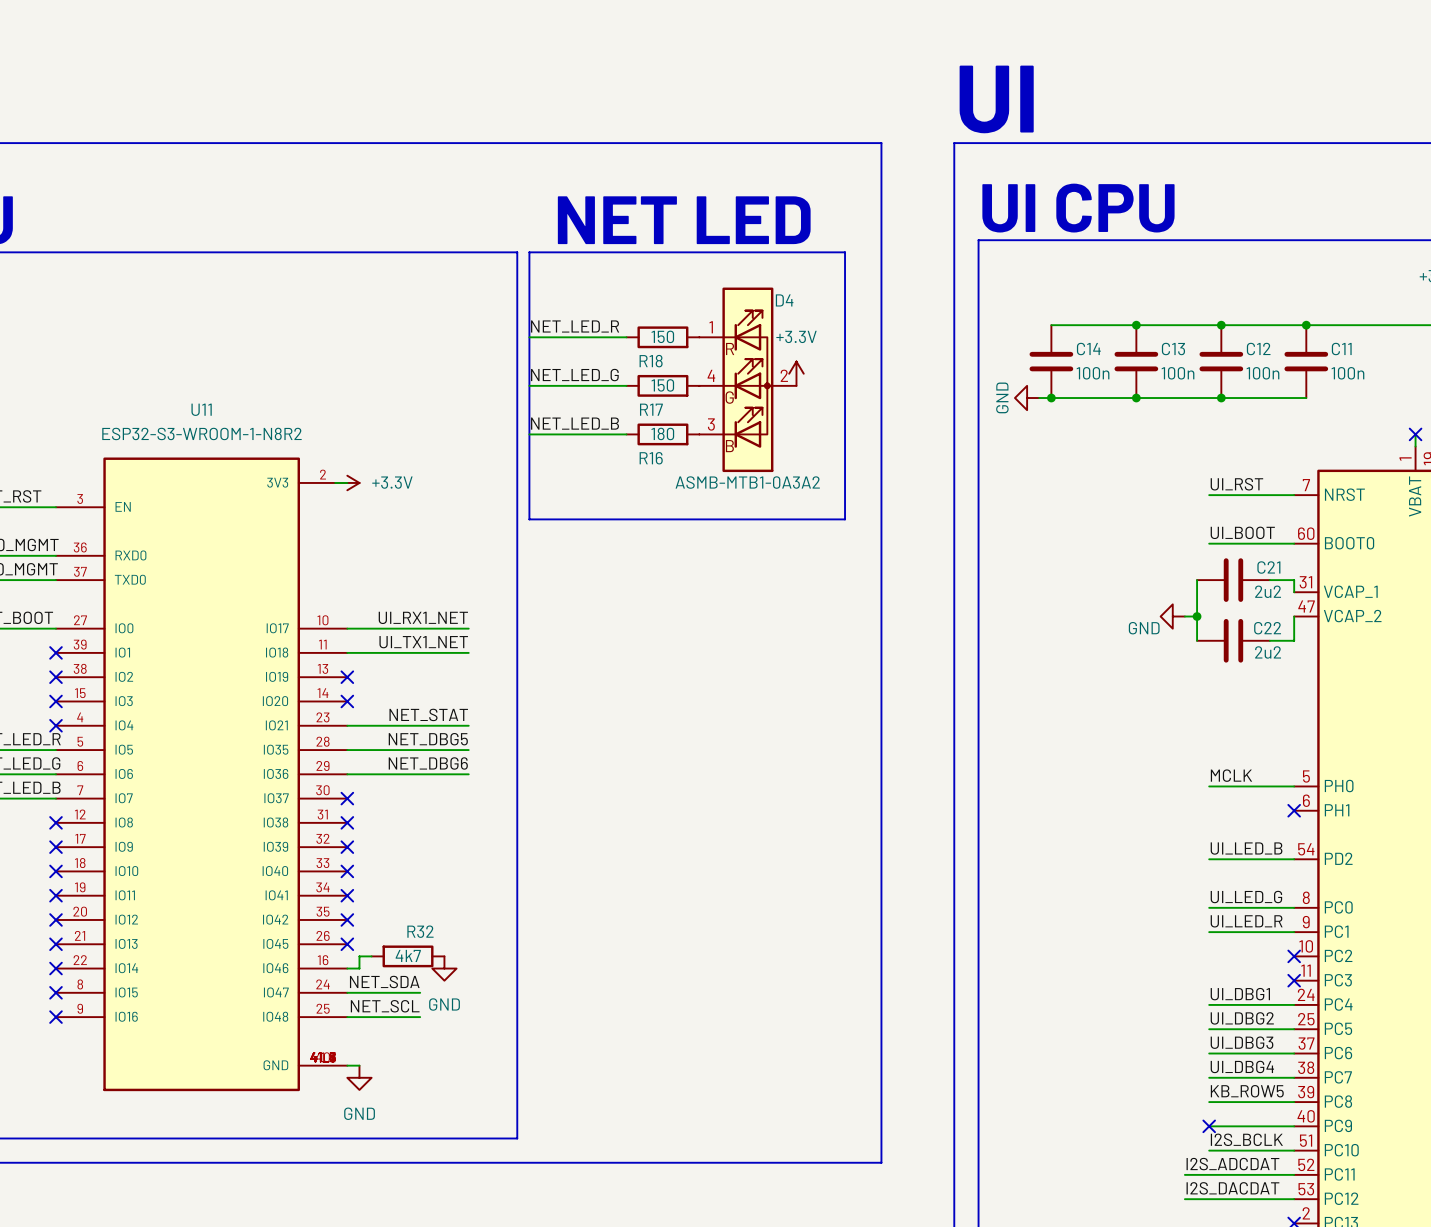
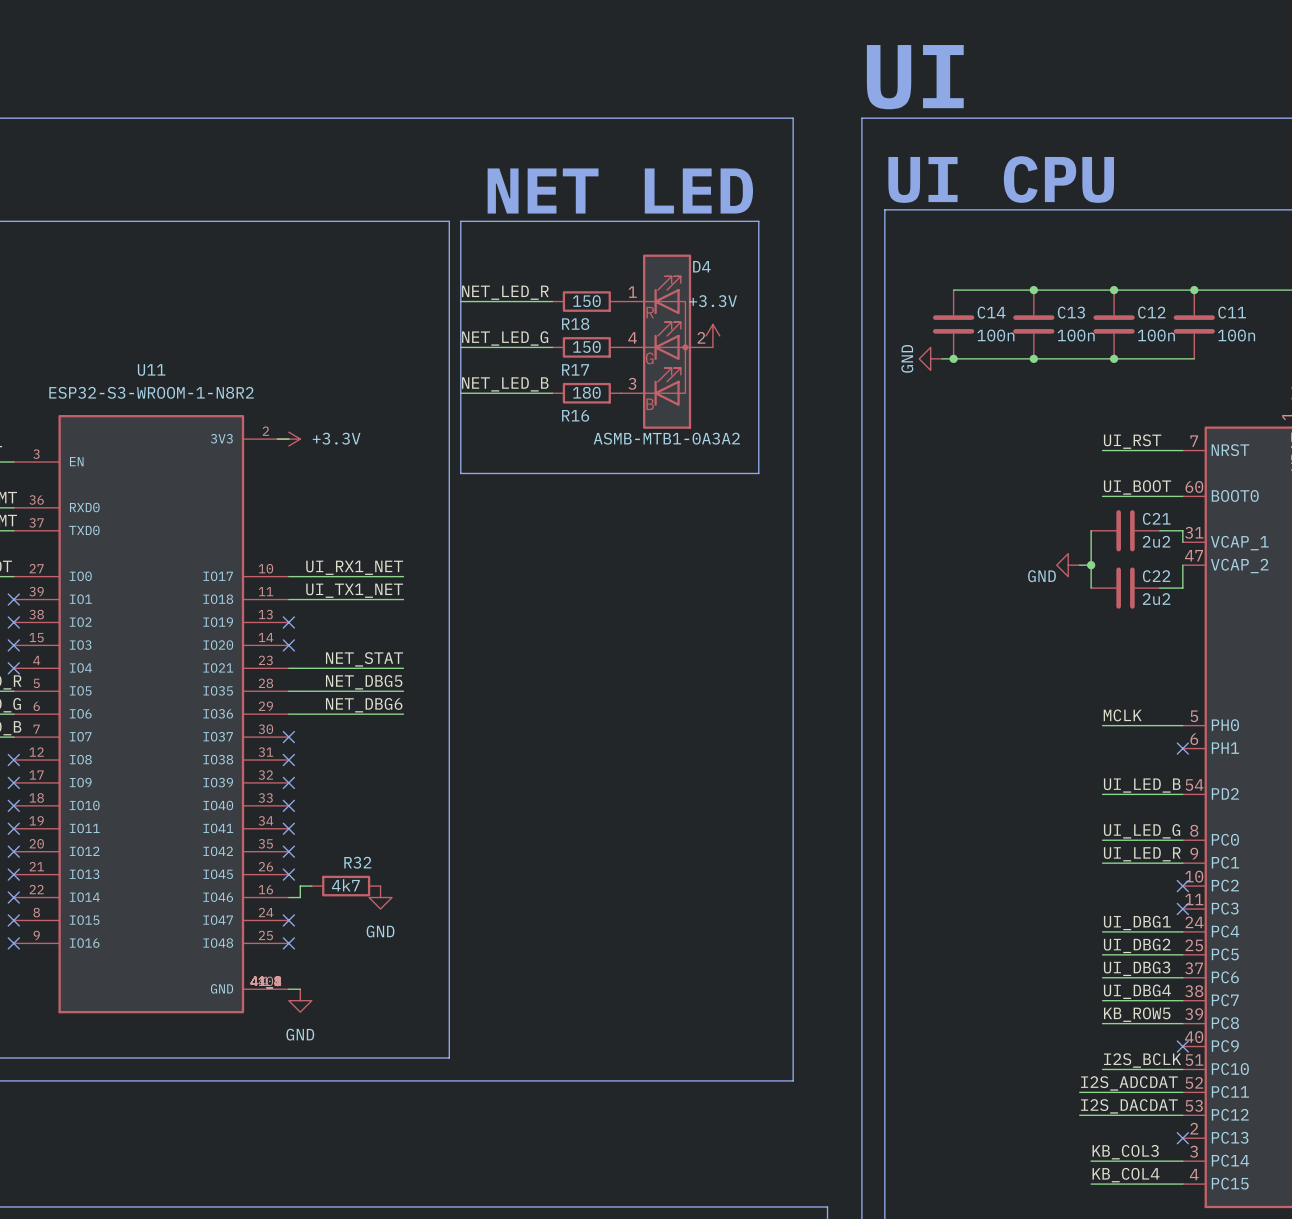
label: NET_SDA (384, 981) -> none
wire: (347, 992) (420, 992) -> none
no-connect mark: none -> (288, 920)
label: NET_SCL (385, 1006) -> none
wire: (347, 1017) (420, 1017) -> none
no-connect mark: none -> (288, 943)
wire: (1209, 1126) (1294, 1126) -> none
no-connect mark: (1209, 1126) -> none
no-connect mark: none -> (1182, 1046)

